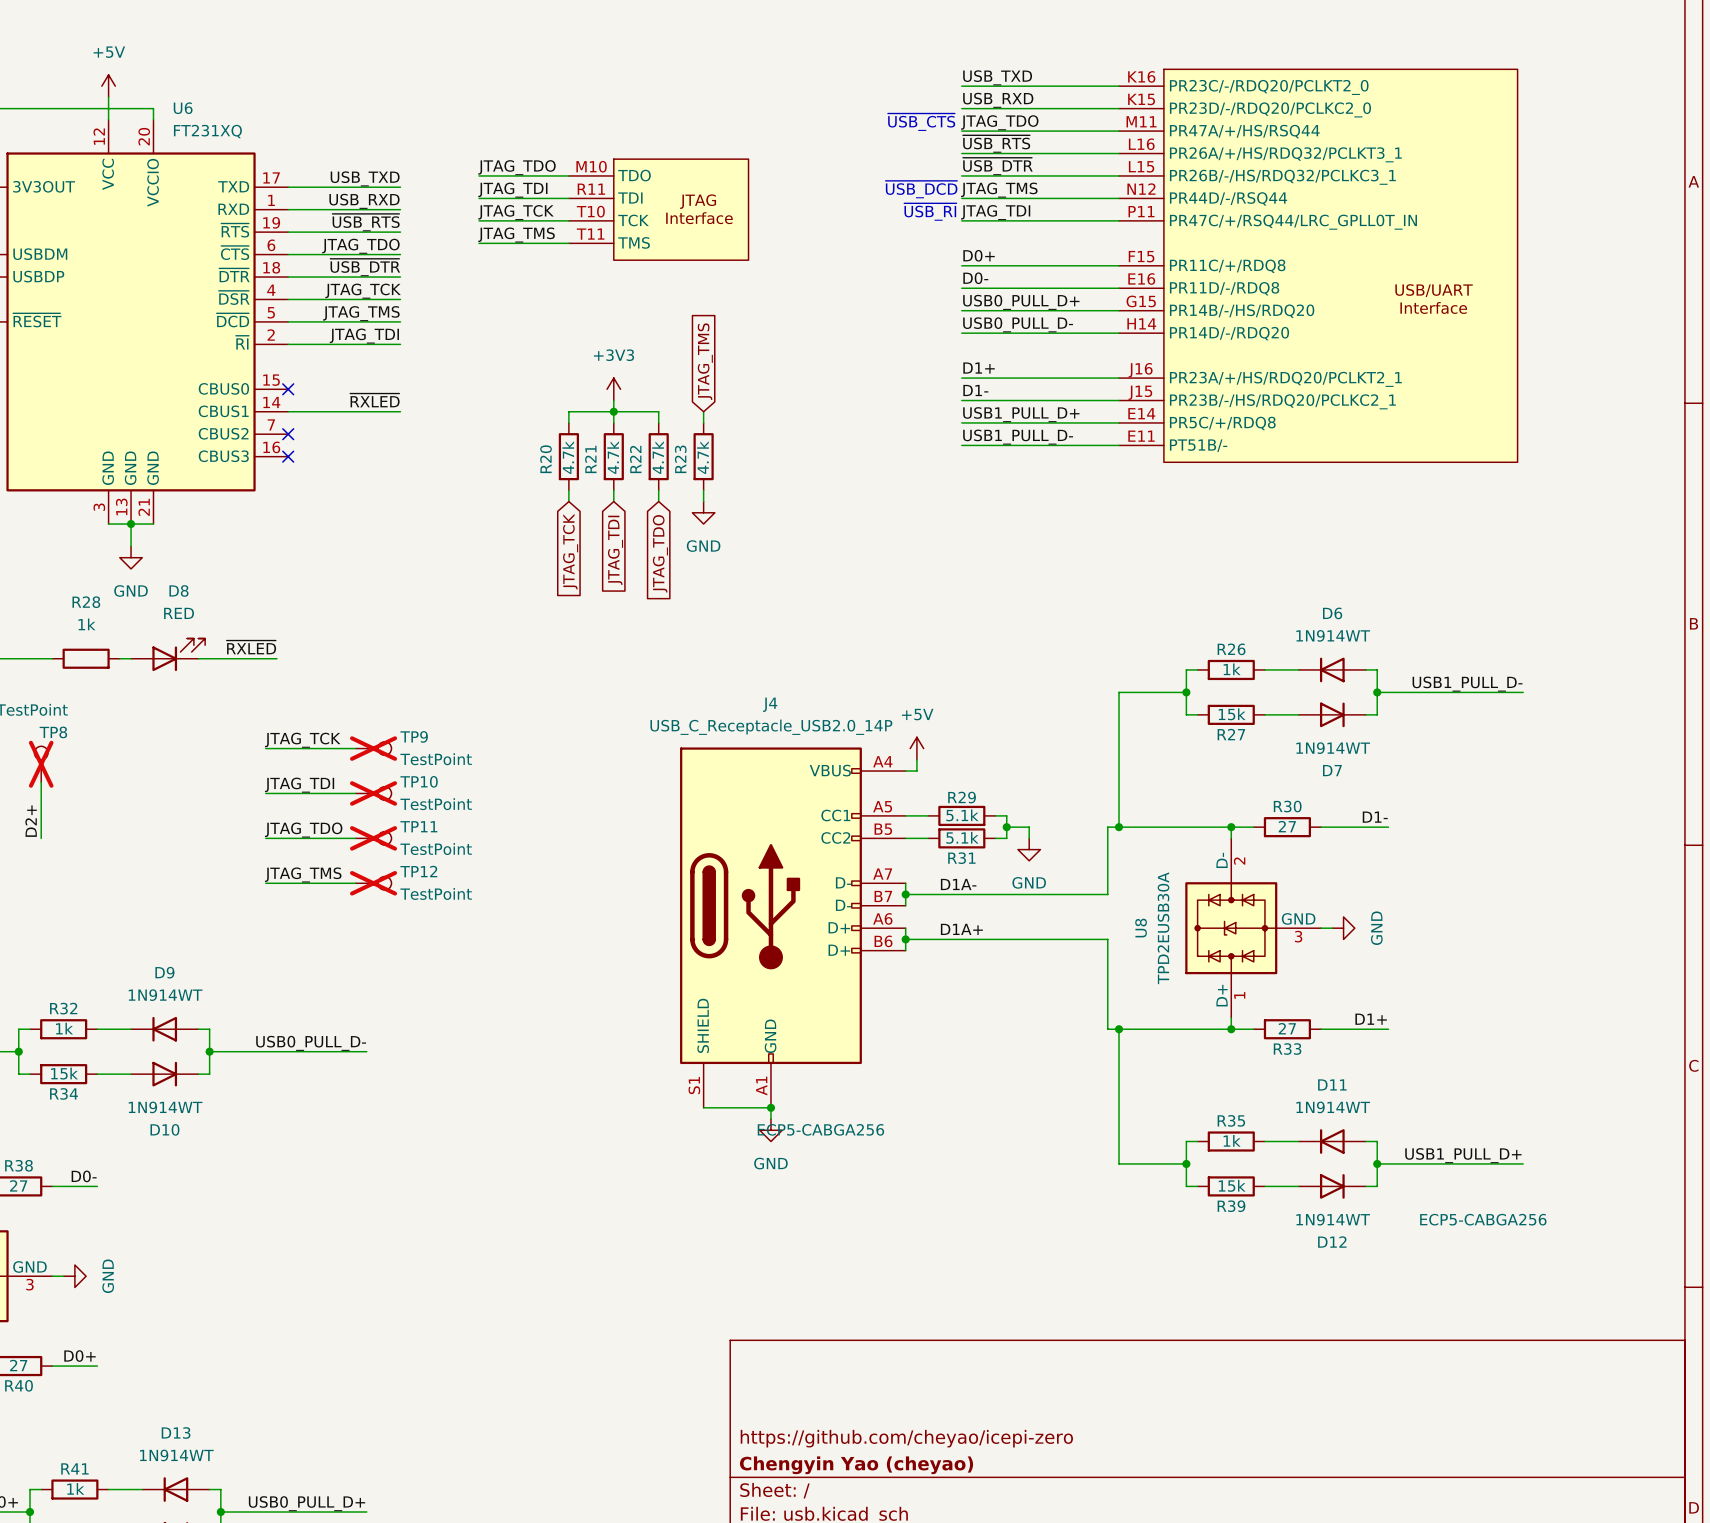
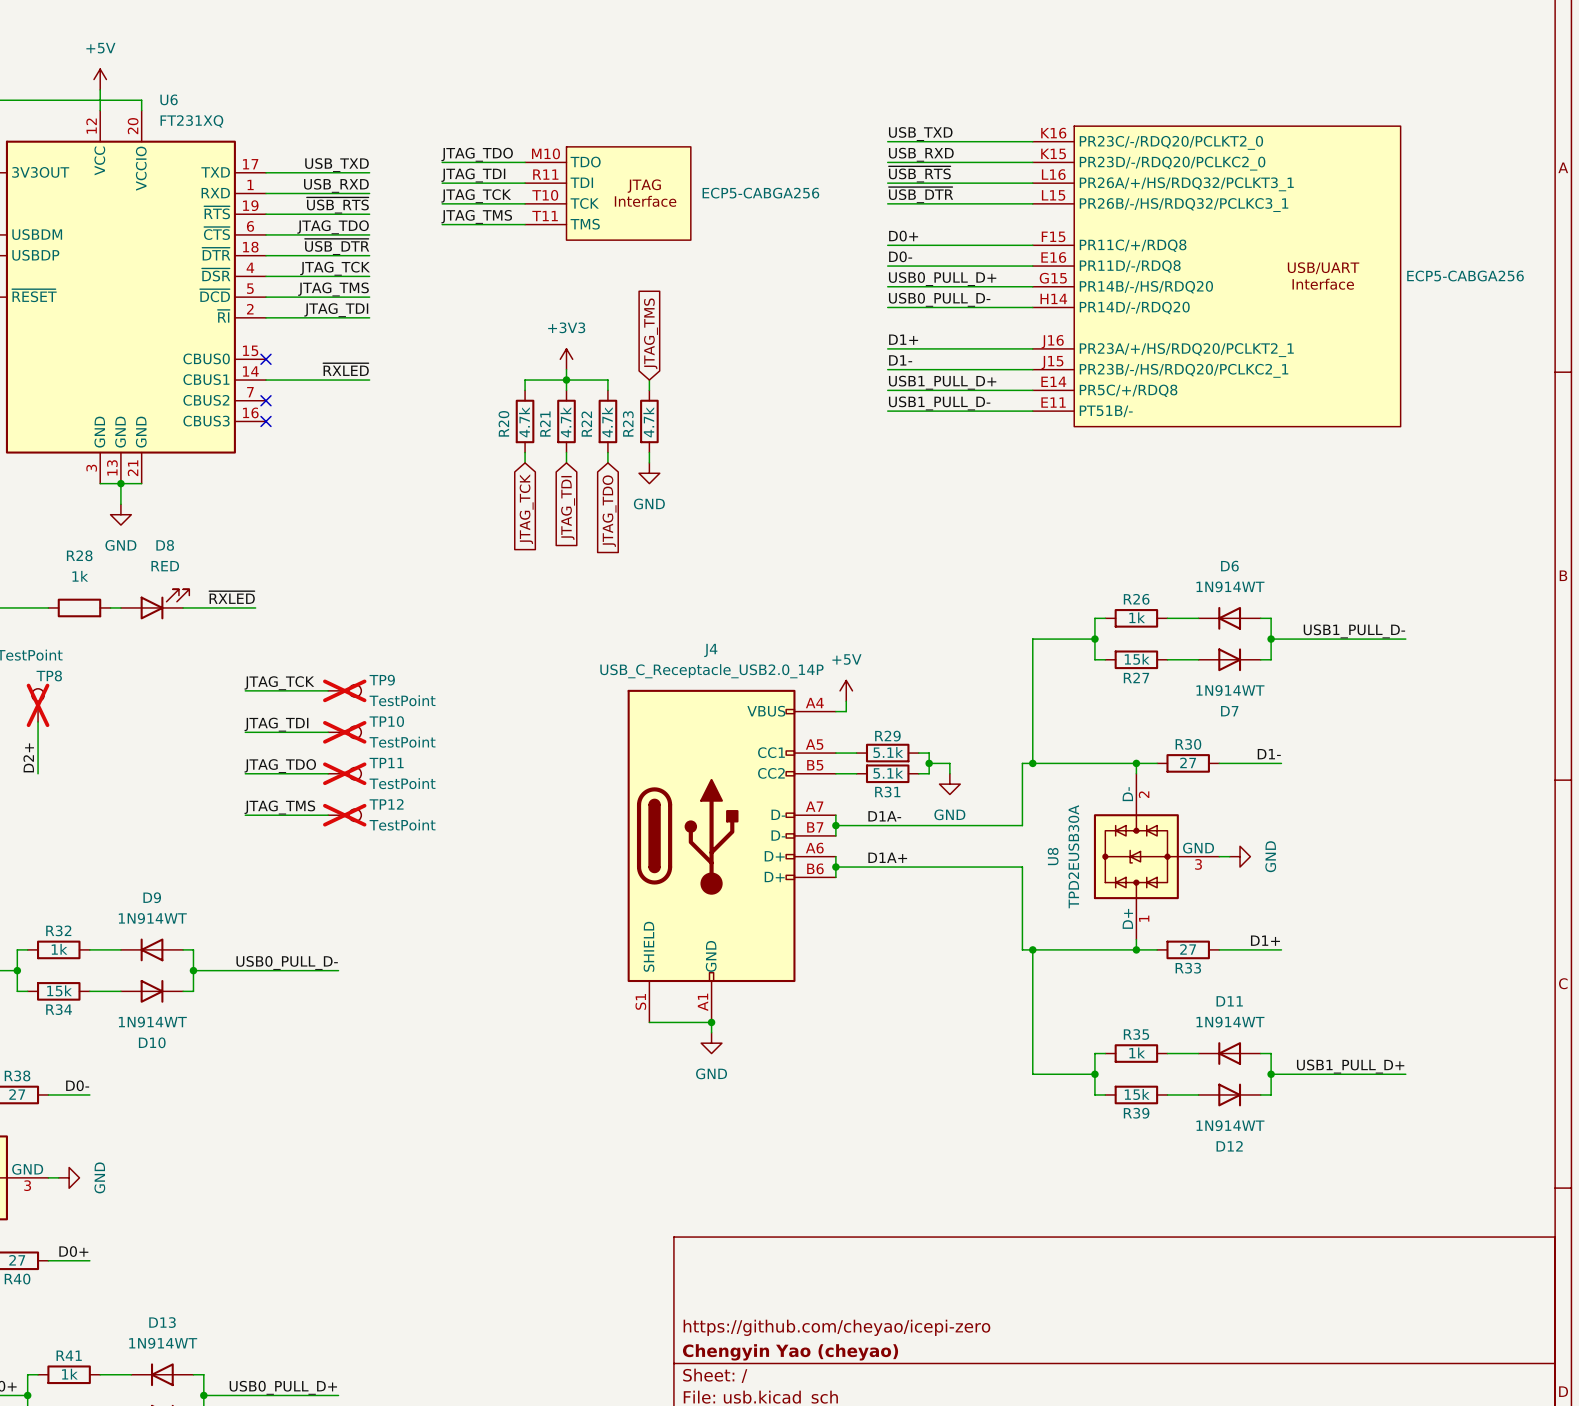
label: USB_TXD (997, 77) -> none
wire: (961, 86) (1119, 86) -> none
label: USB_RXD (998, 100) -> none
wire: (961, 108) (1119, 108) -> none
text: ~{USB_CTS} (921, 122) -> none
label: JTAG_TDO (999, 122) -> none
wire: (961, 131) (1119, 131) -> none
label: ~{USB_RTS} (996, 144) -> USB_TXD (920, 134)
label: ~{USB_DTR} (997, 166) -> USB_RXD (921, 154)
text: ~{USB_DCD} (921, 189) -> none
label: JTAG_TMS (999, 190) -> ~{USB_RTS} (919, 174)
text: ~{USB_RI} (930, 212) -> none
label: JTAG_TDI (995, 212) -> ~{USB_DTR} (920, 195)
part: ECP5-CABGA256 (1318, 265) -> none
part: none -> ECP5-CABGA256 (1216, 276)
part value position: ECP5-CABGA256 (820, 1129) -> ECP5-CABGA256 (760, 193)

